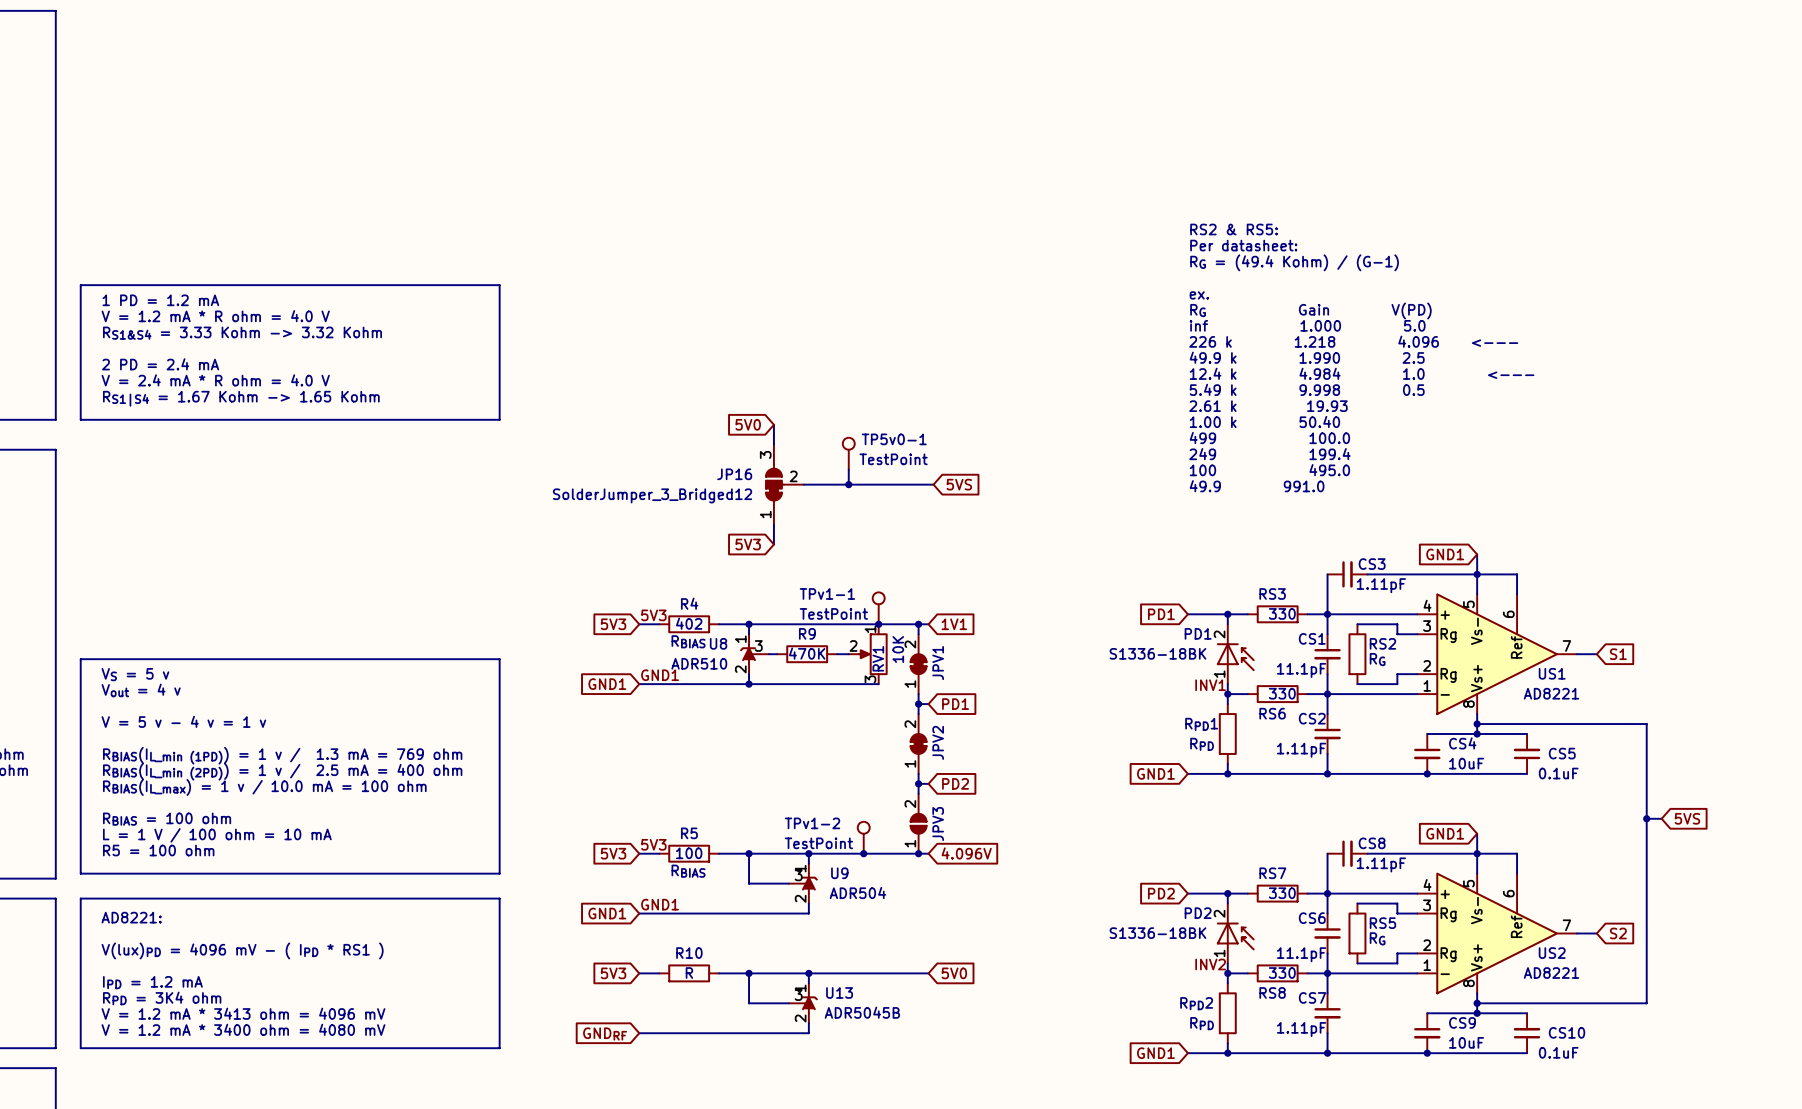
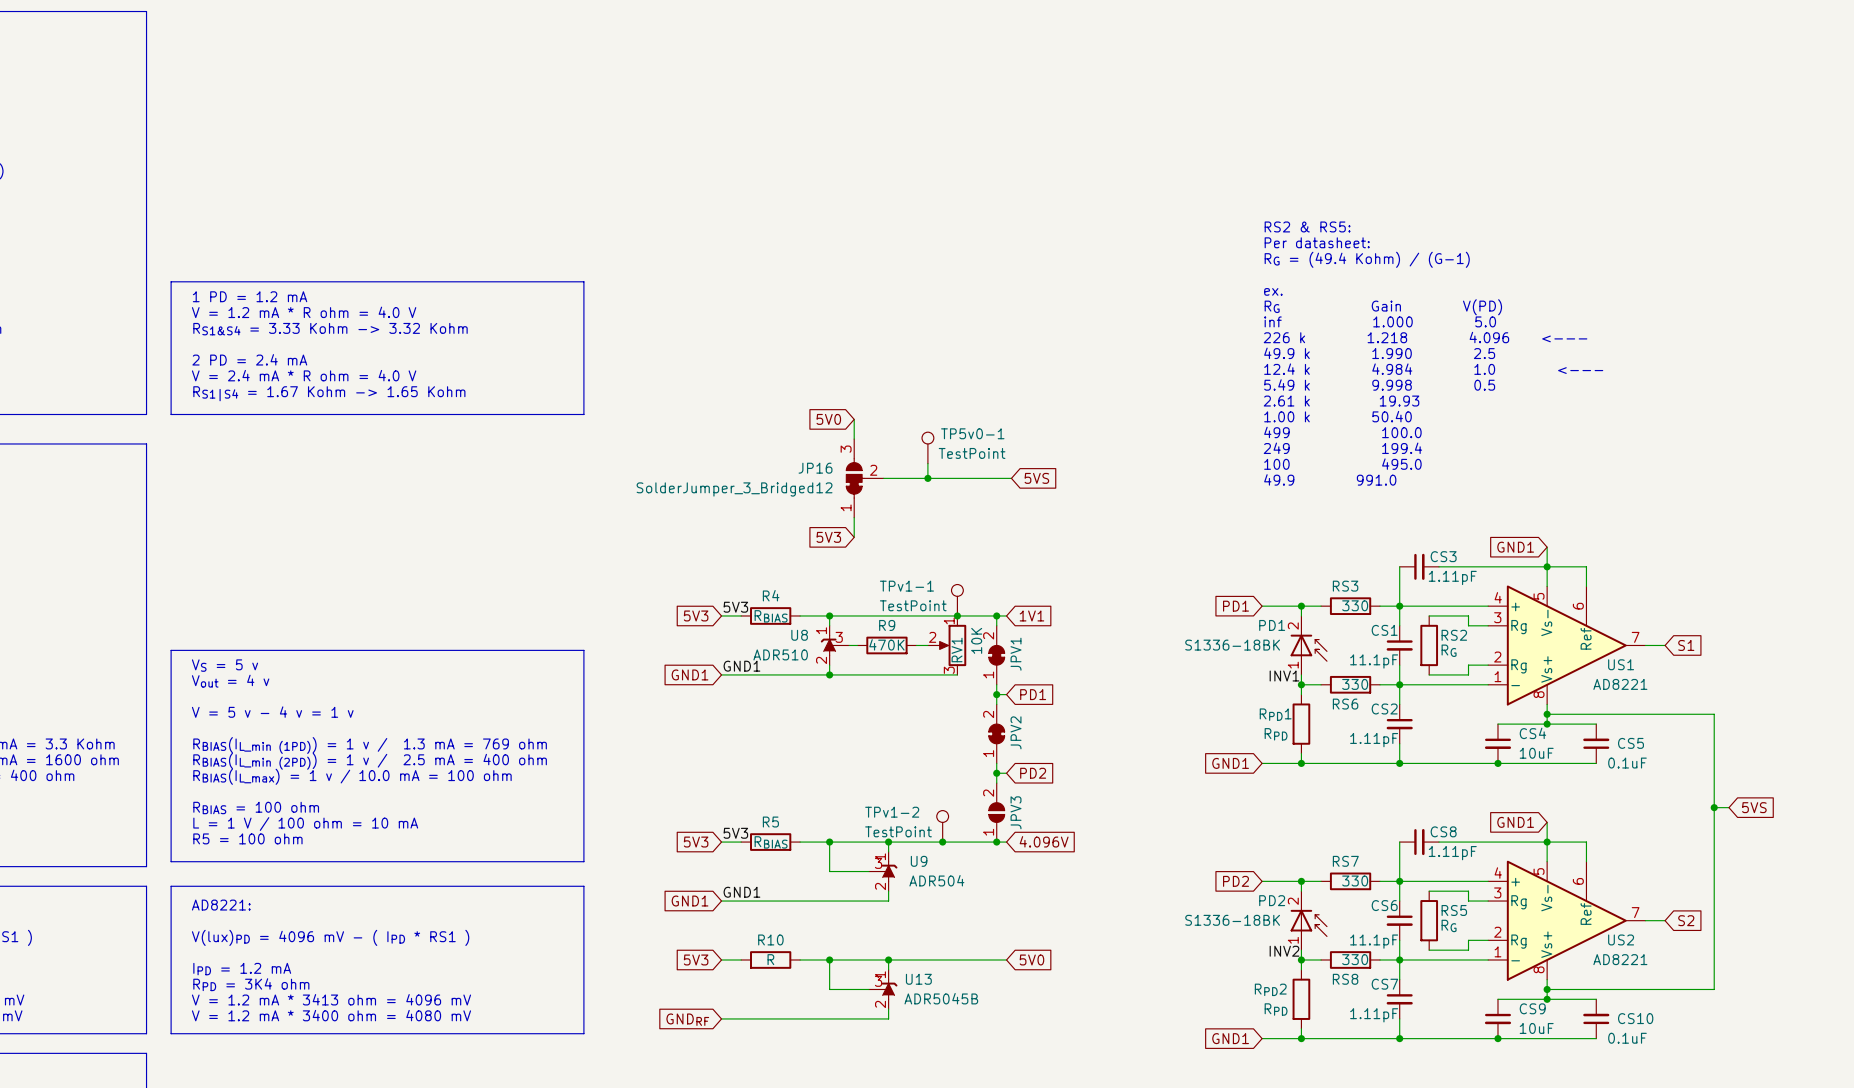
R4 value: 402 (689, 623) -> RBIAS (771, 616)
text: RBIAS (688, 641) -> none
R5 value: 100 (689, 853) -> RBIAS (771, 842)
text: RBIAS (688, 871) -> none

